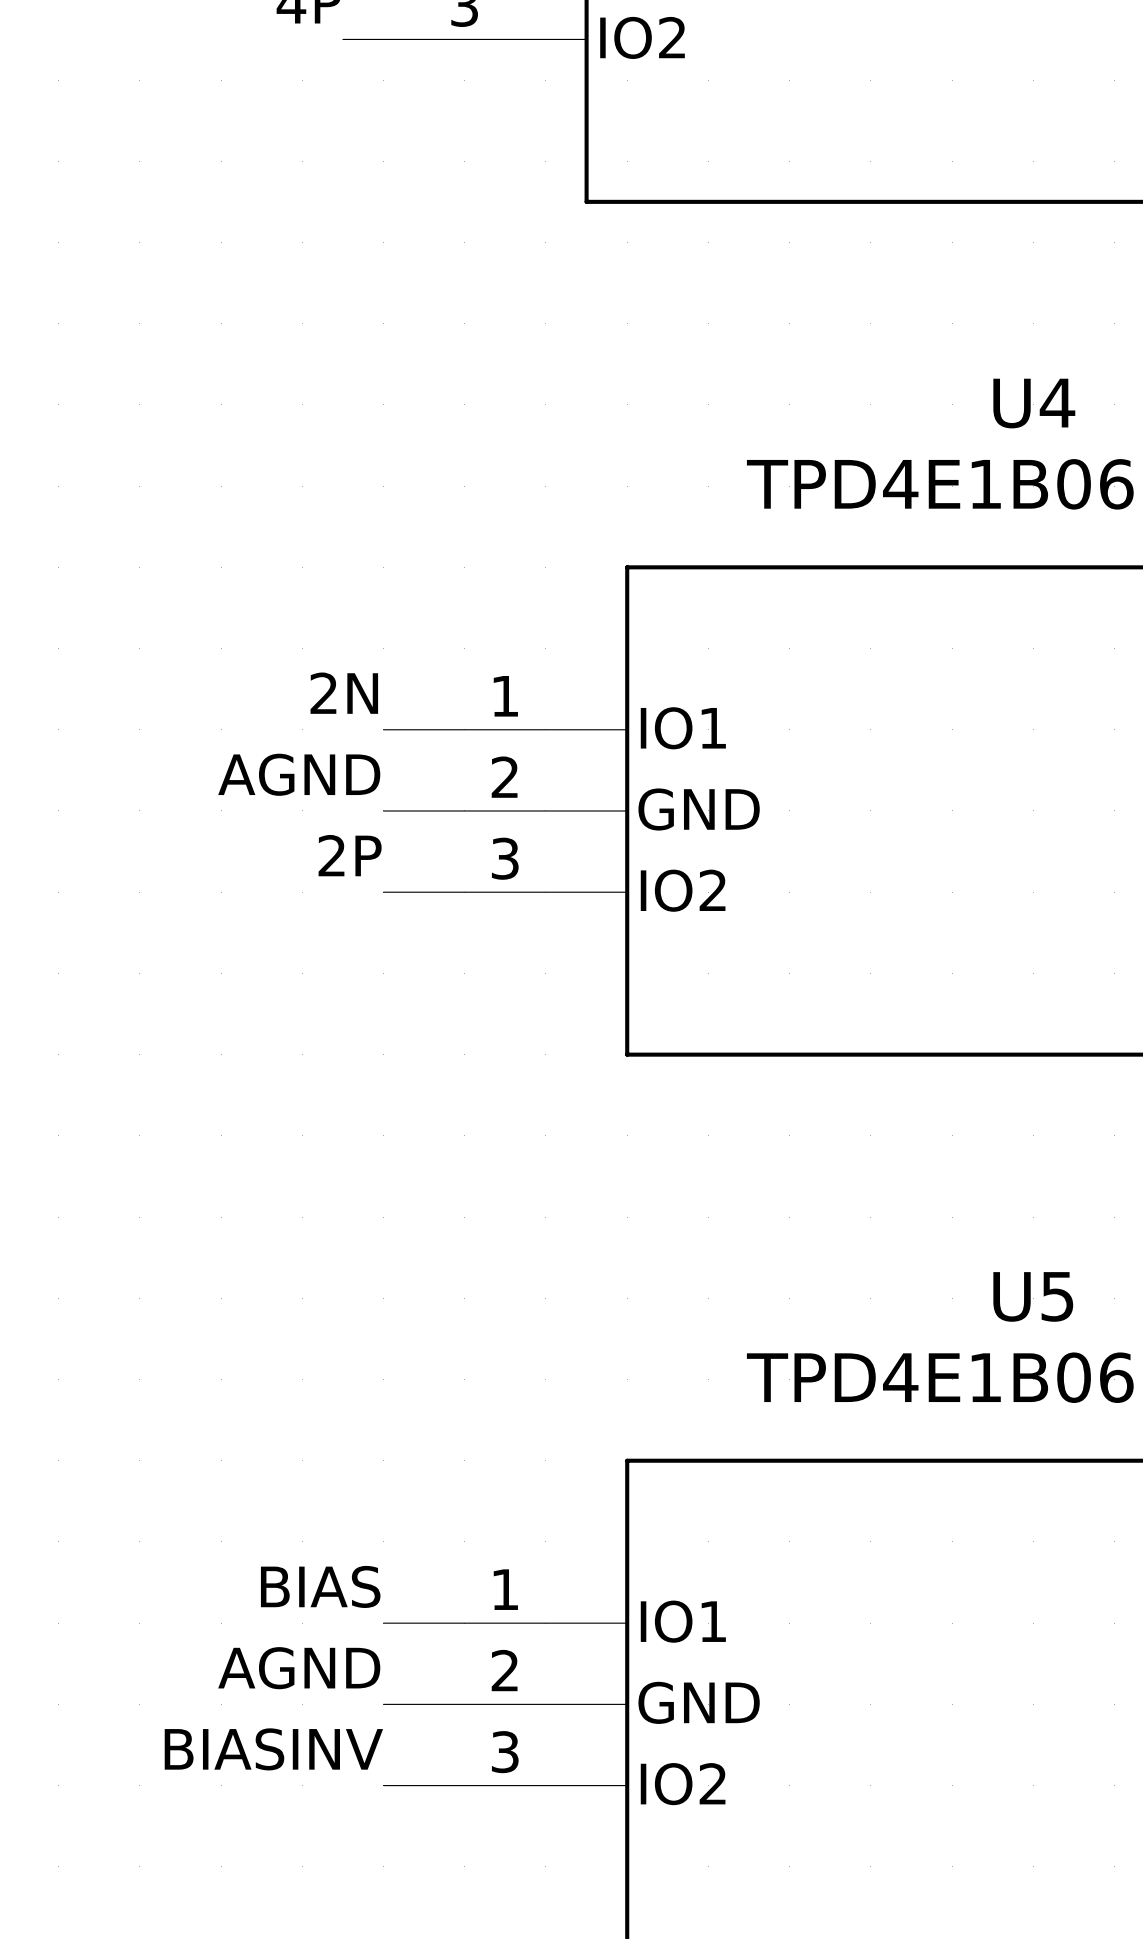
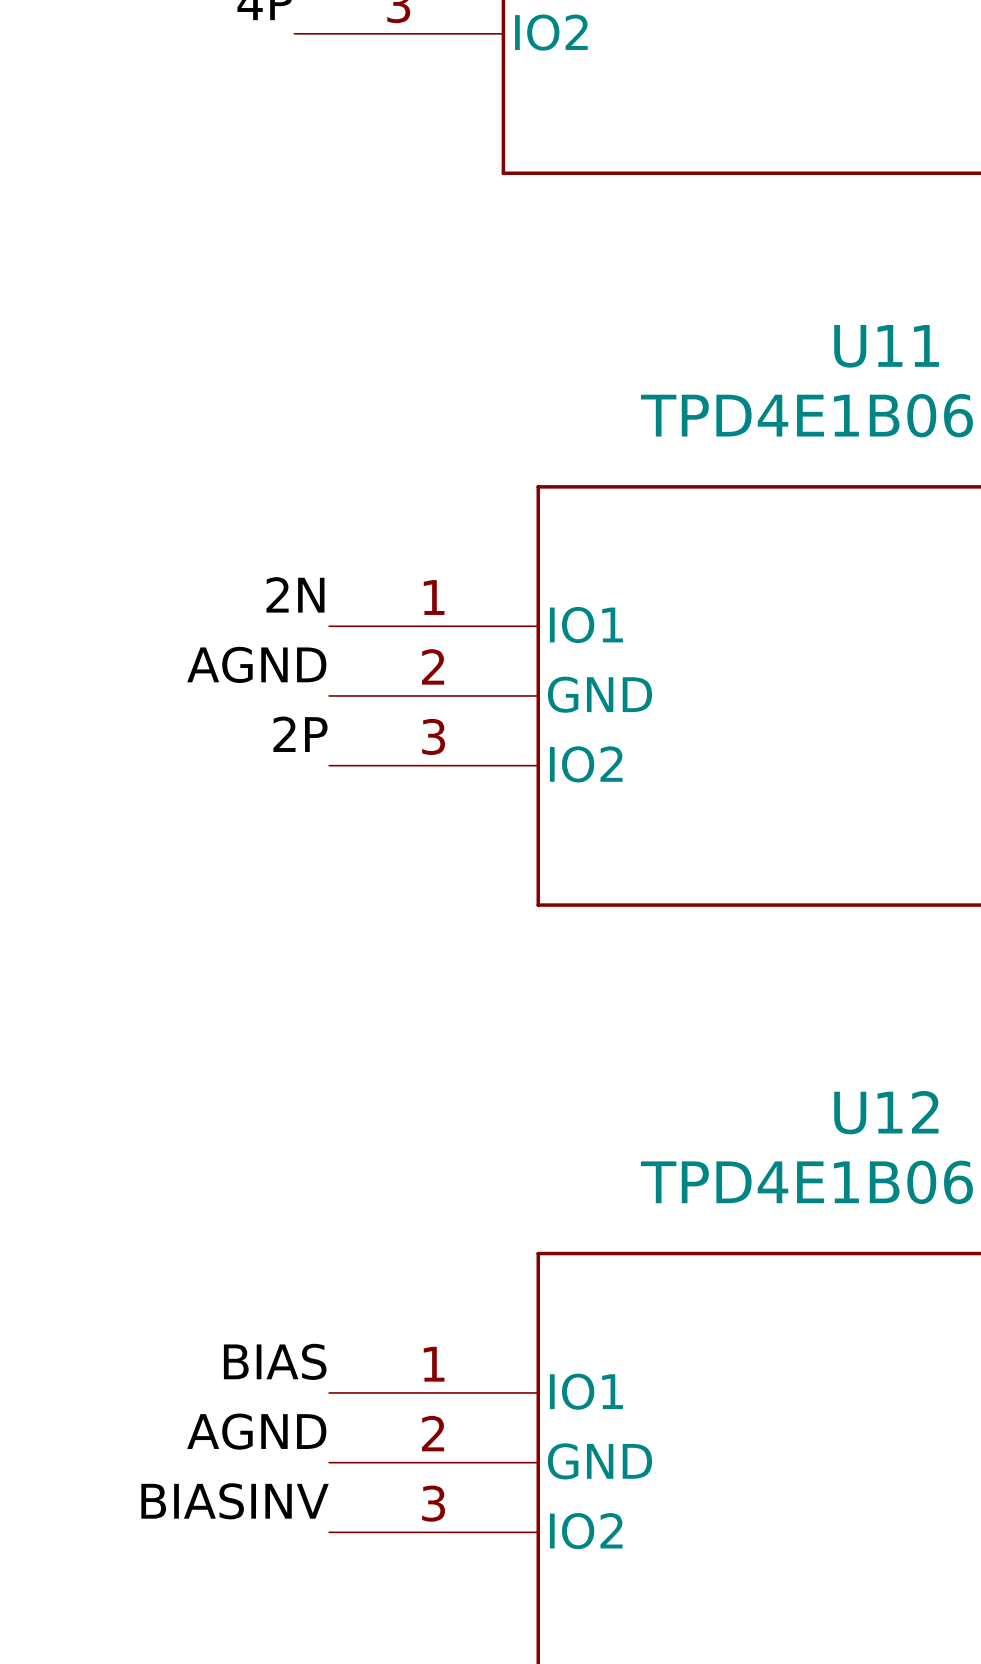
U4 name: U4 (1034, 403) -> U11 (886, 346)
U5 name: U5 (1033, 1296) -> U12 (886, 1112)

